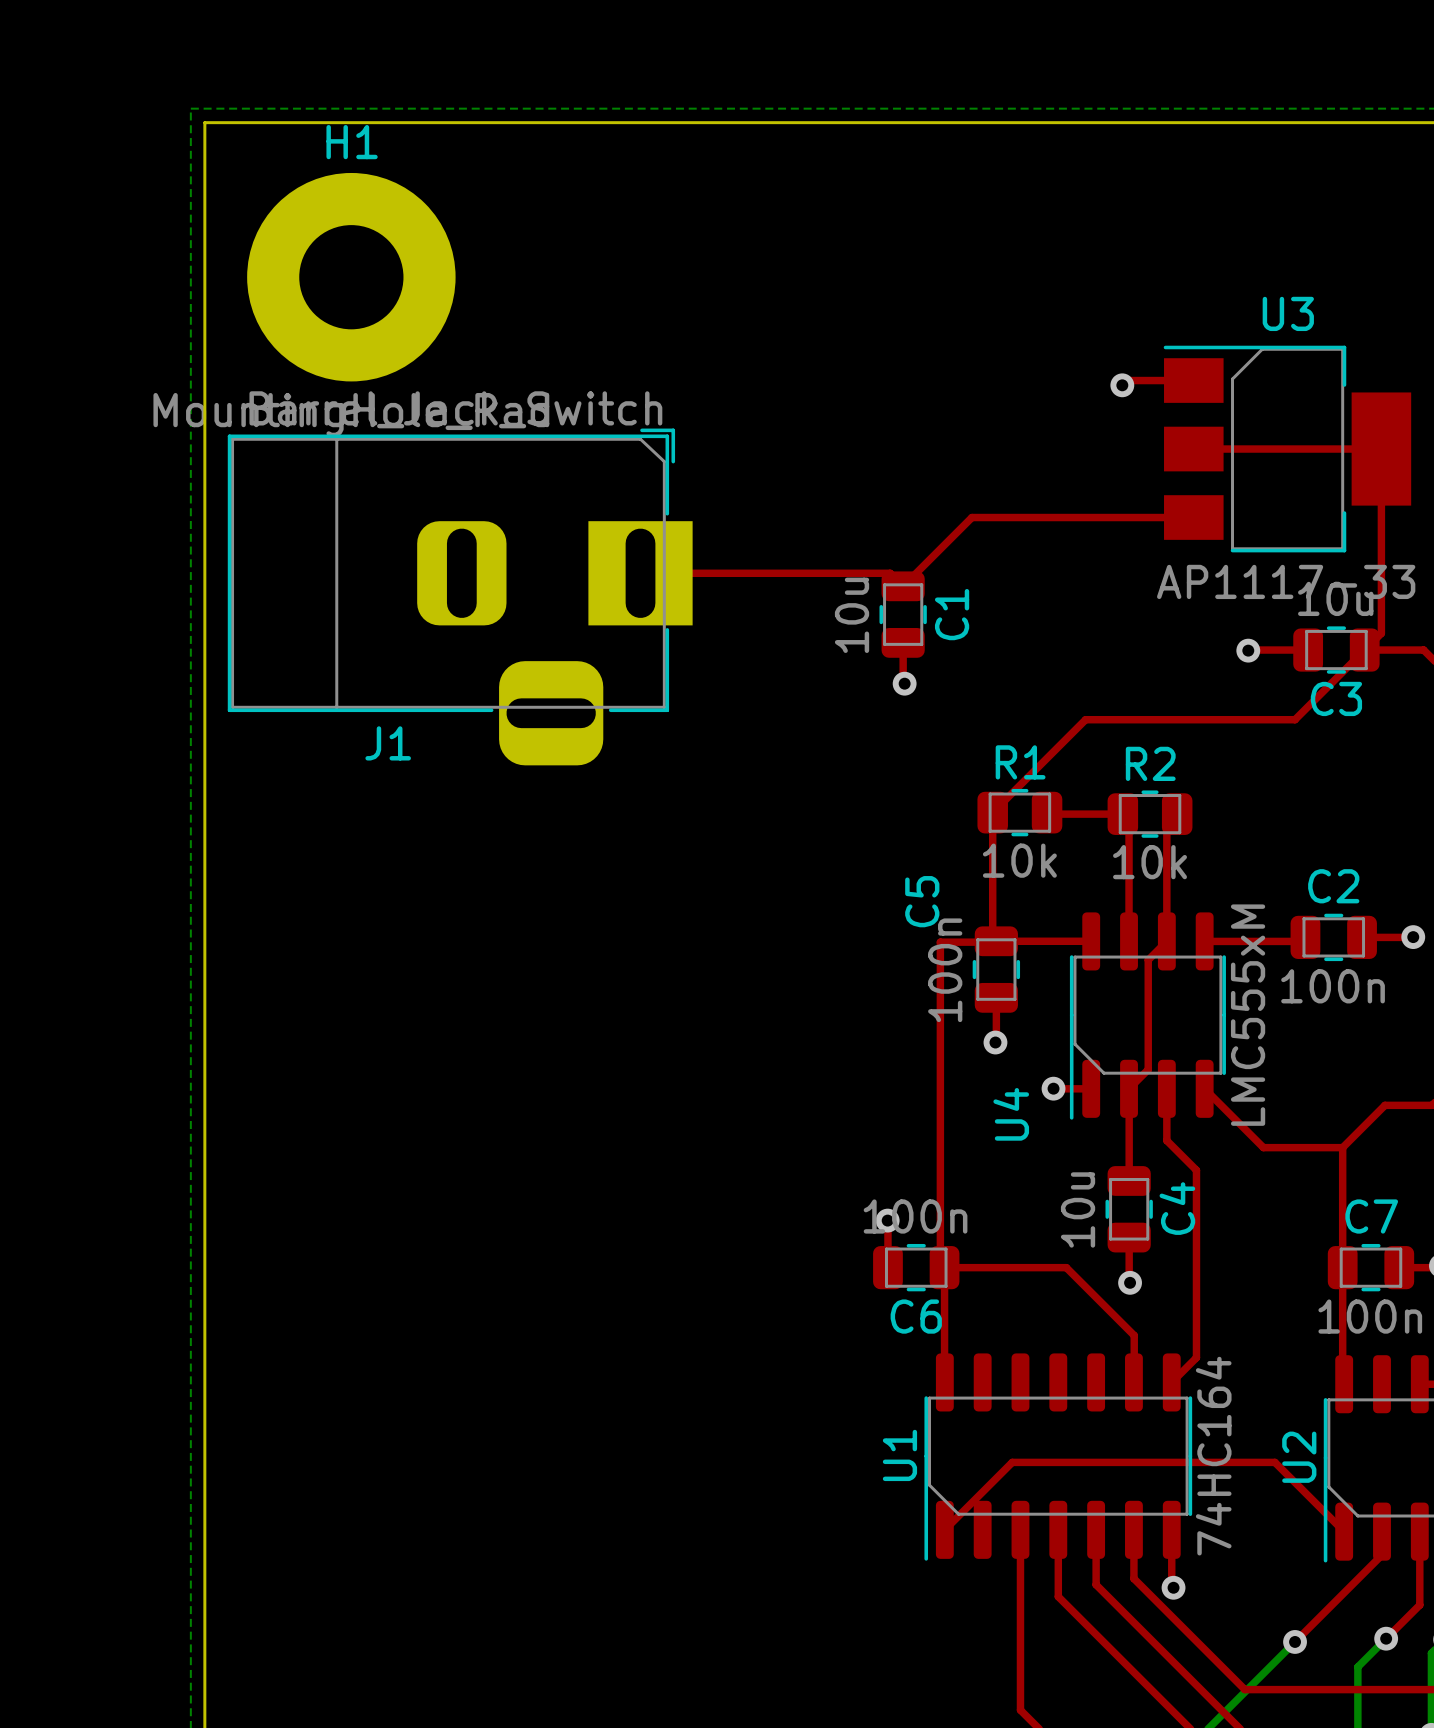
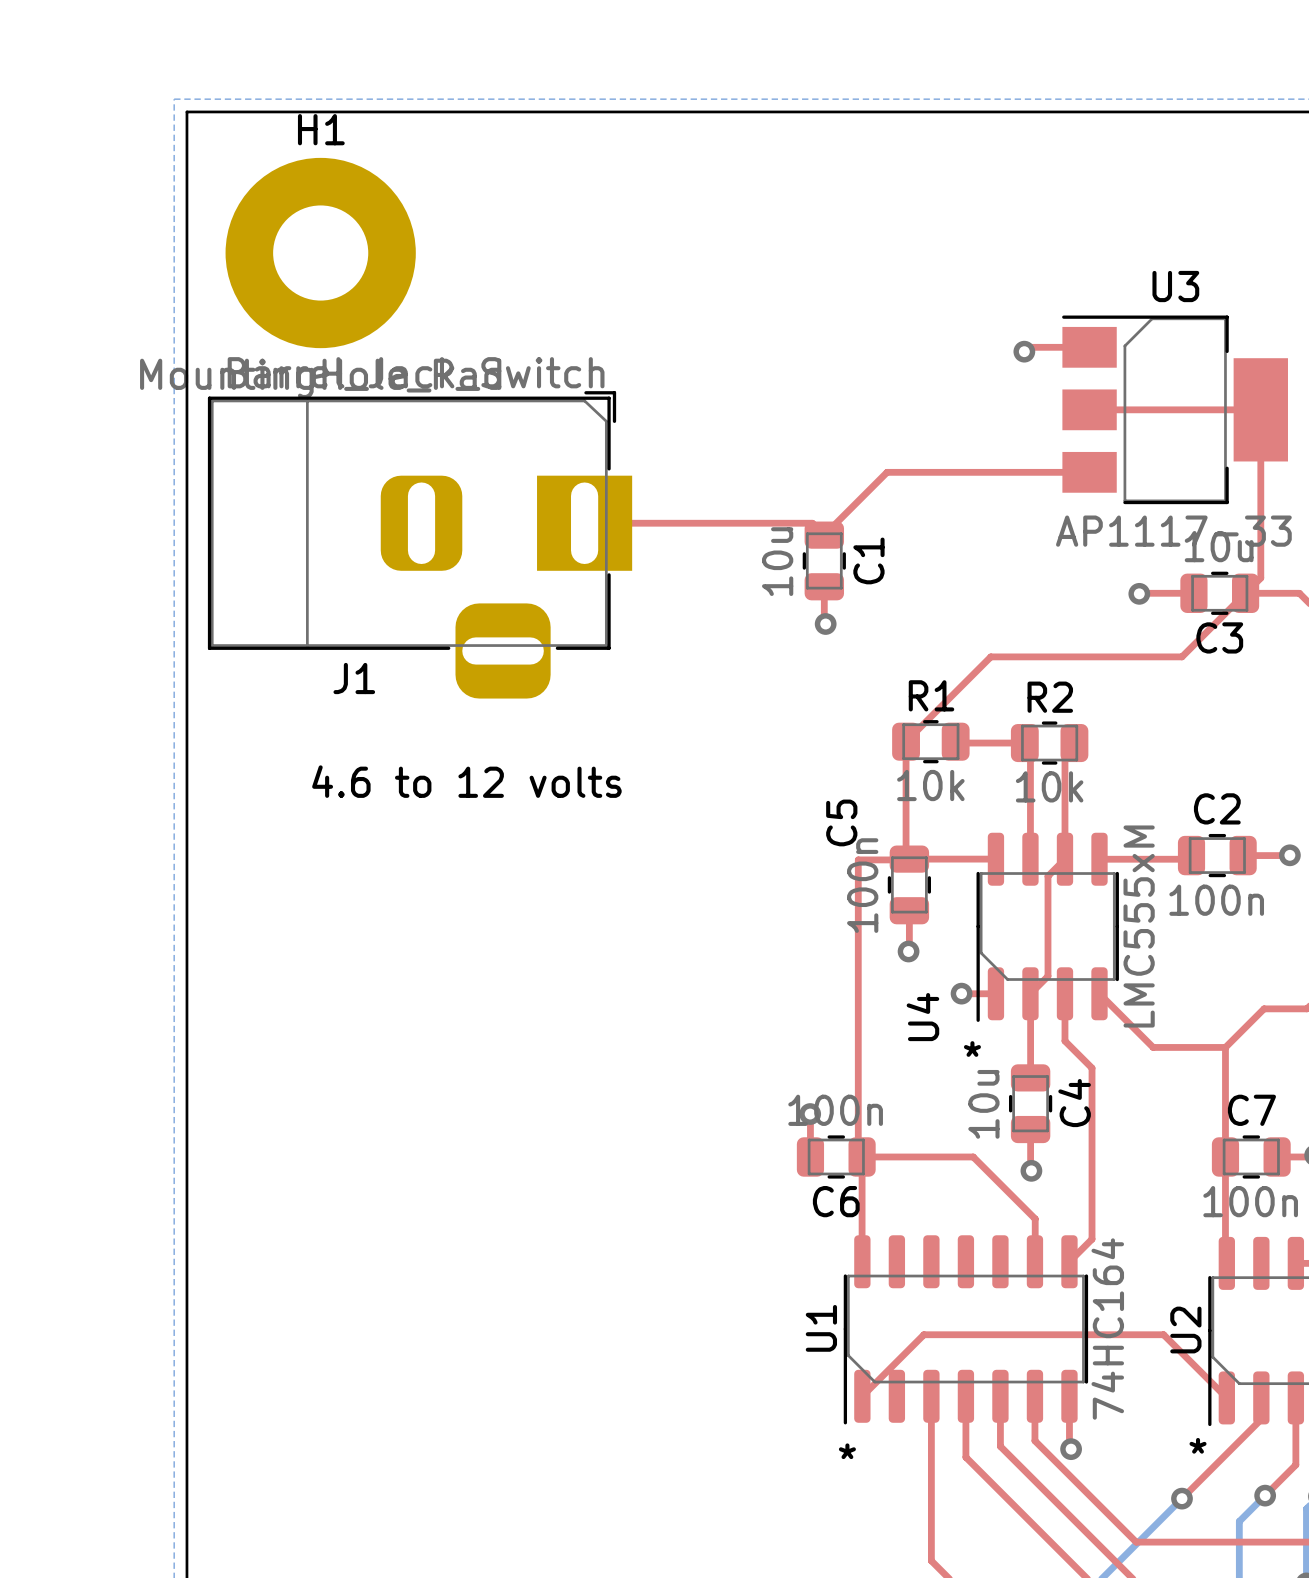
text: none -> 4.6 to 12 volts (466, 781)
text: none -> * (972, 1049)
text: none -> * (1198, 1445)
text: none -> * (847, 1451)

